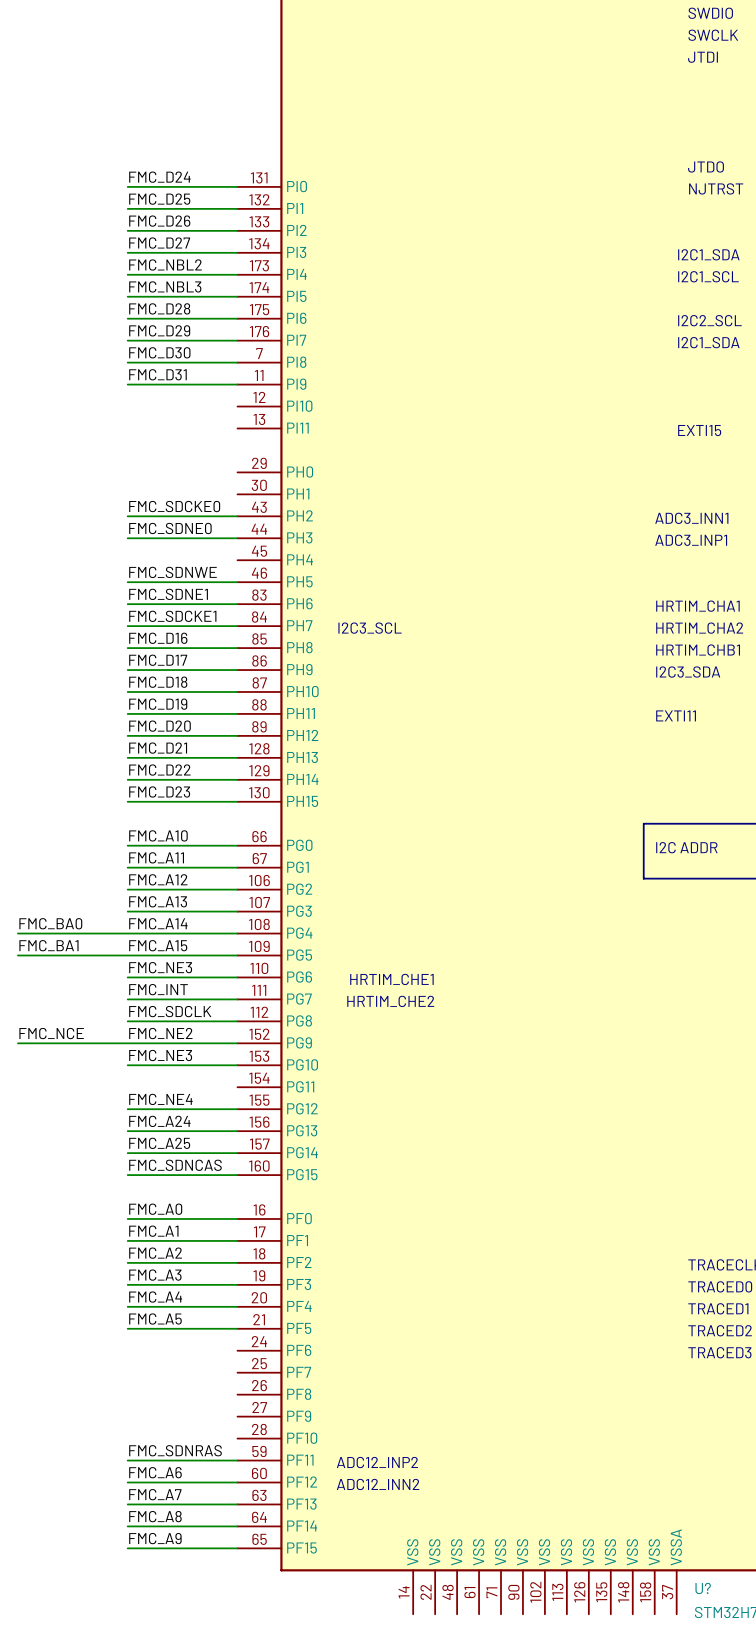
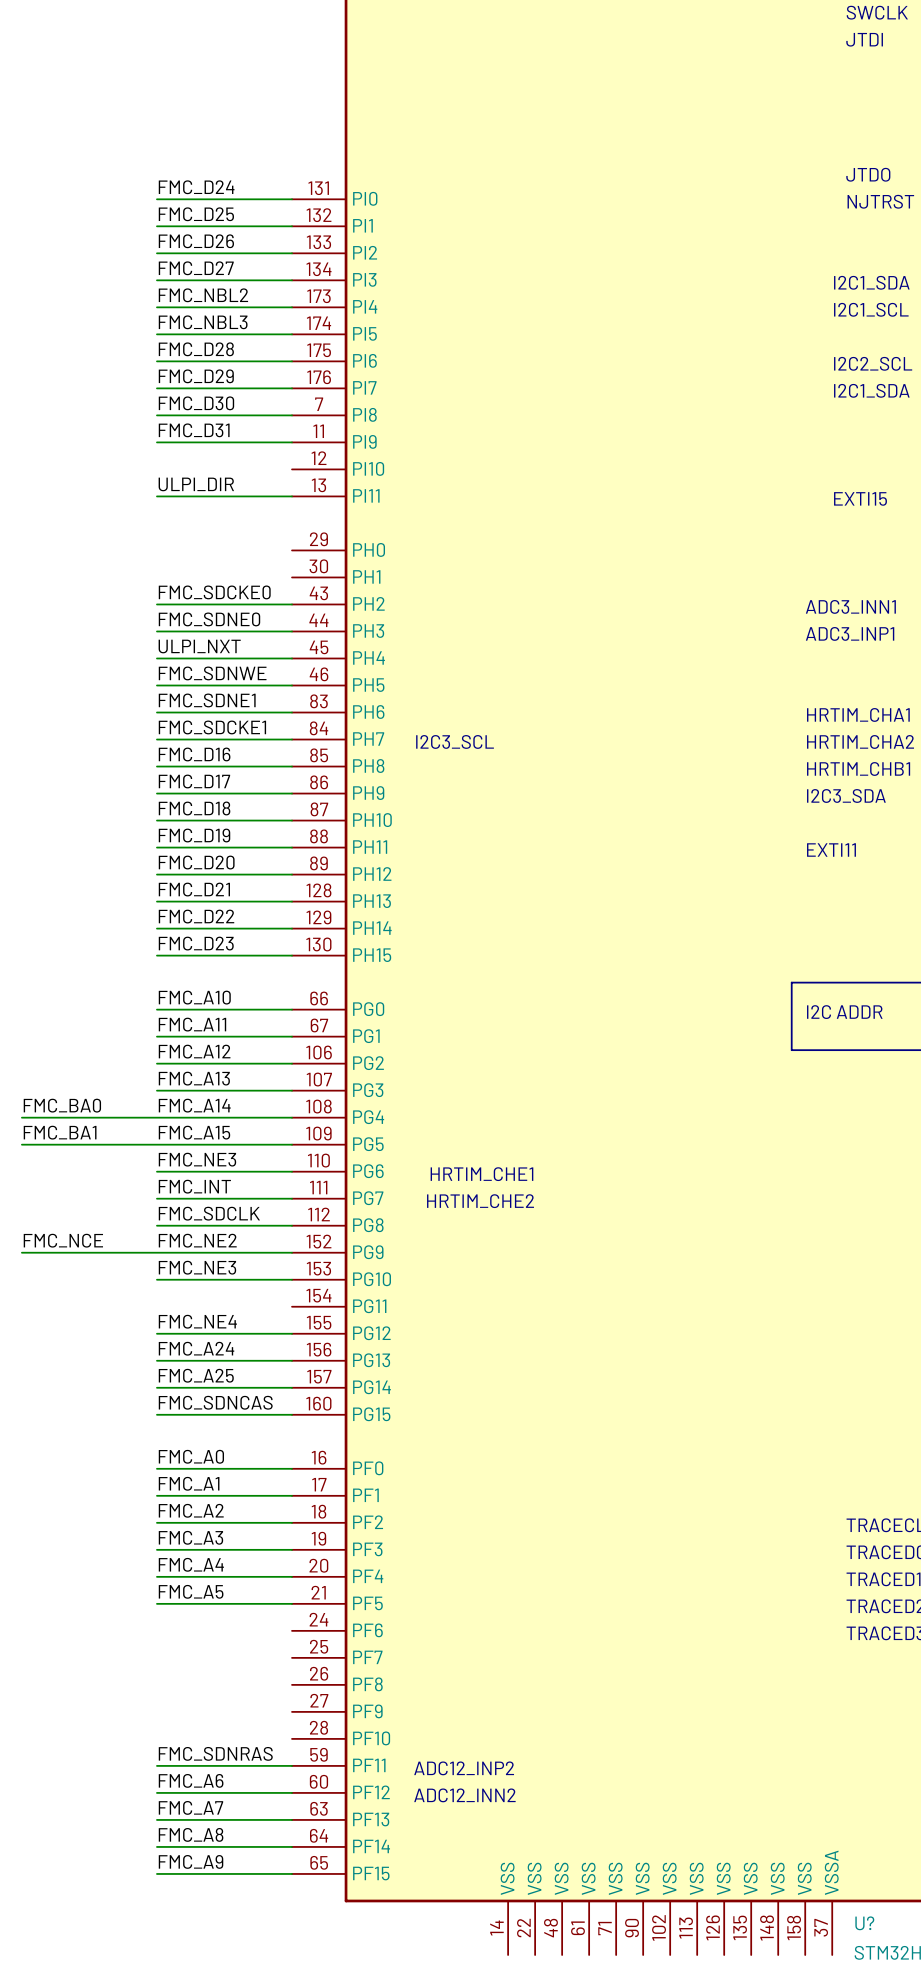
label: none -> ULPI_DIR (196, 484)
wire: none -> (156, 496) (292, 496)
label: none -> ULPI_NXT (199, 646)
wire: none -> (156, 658) (292, 658)

